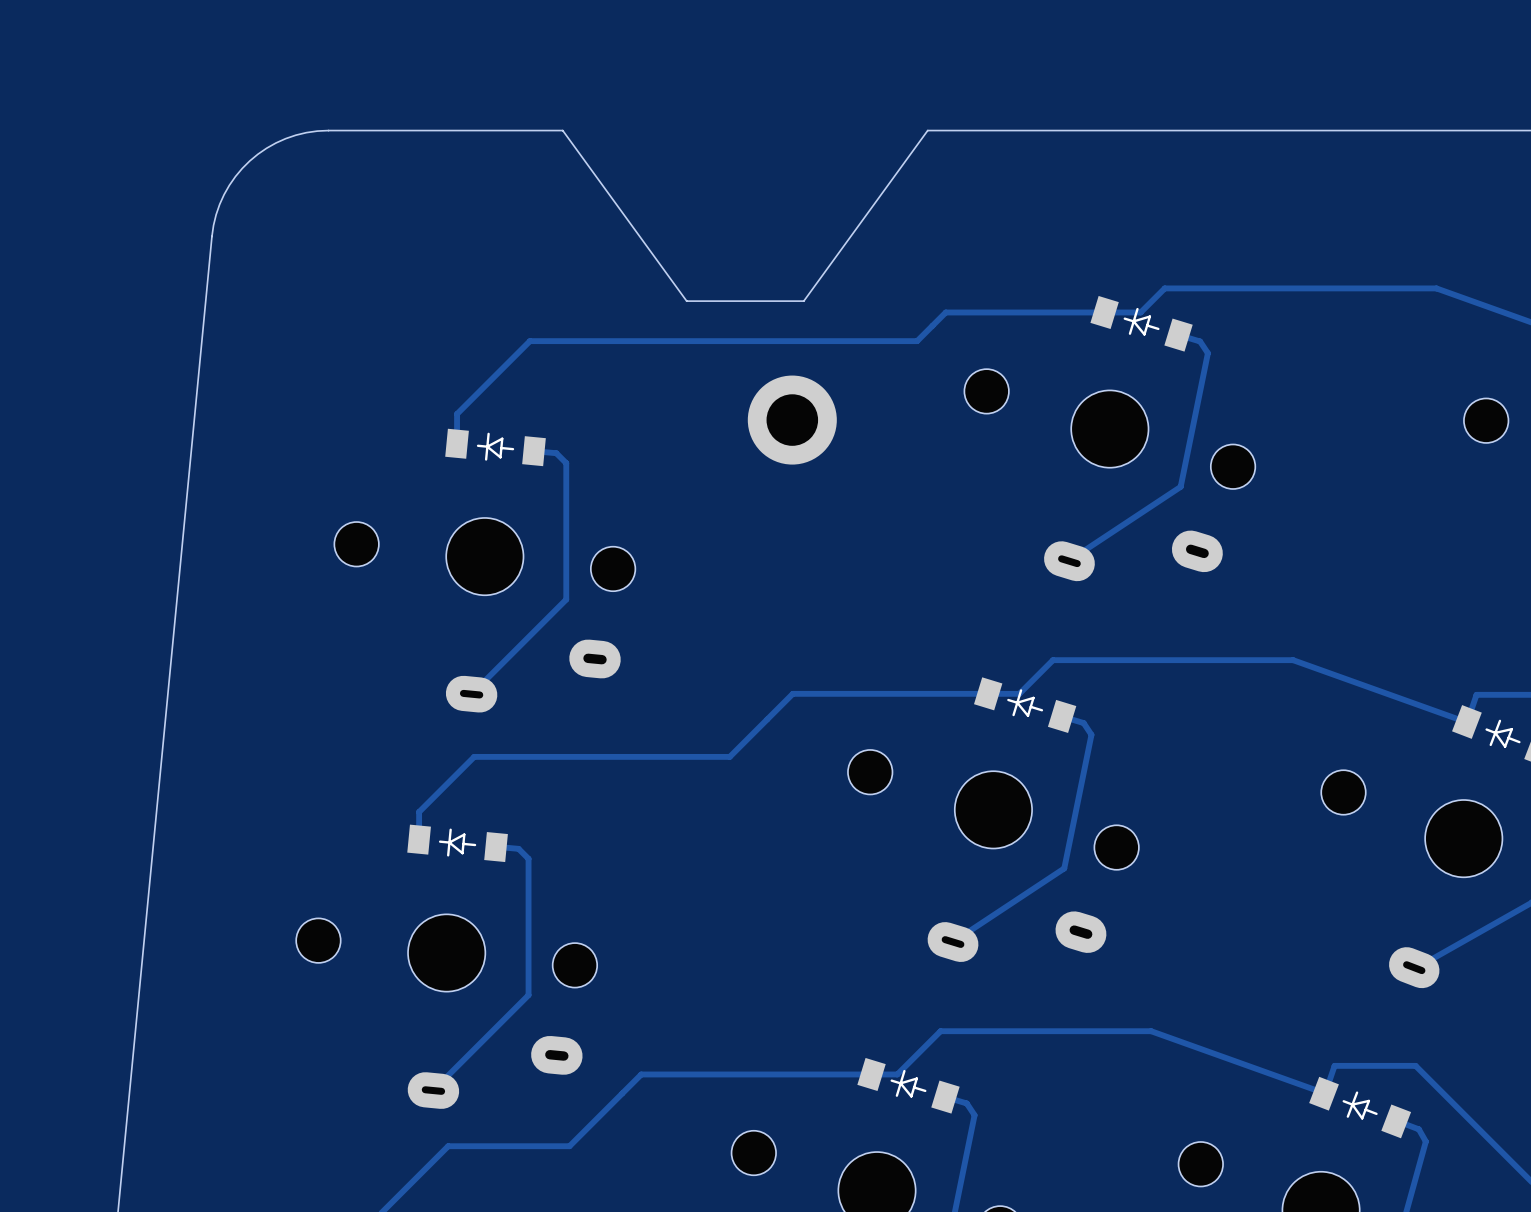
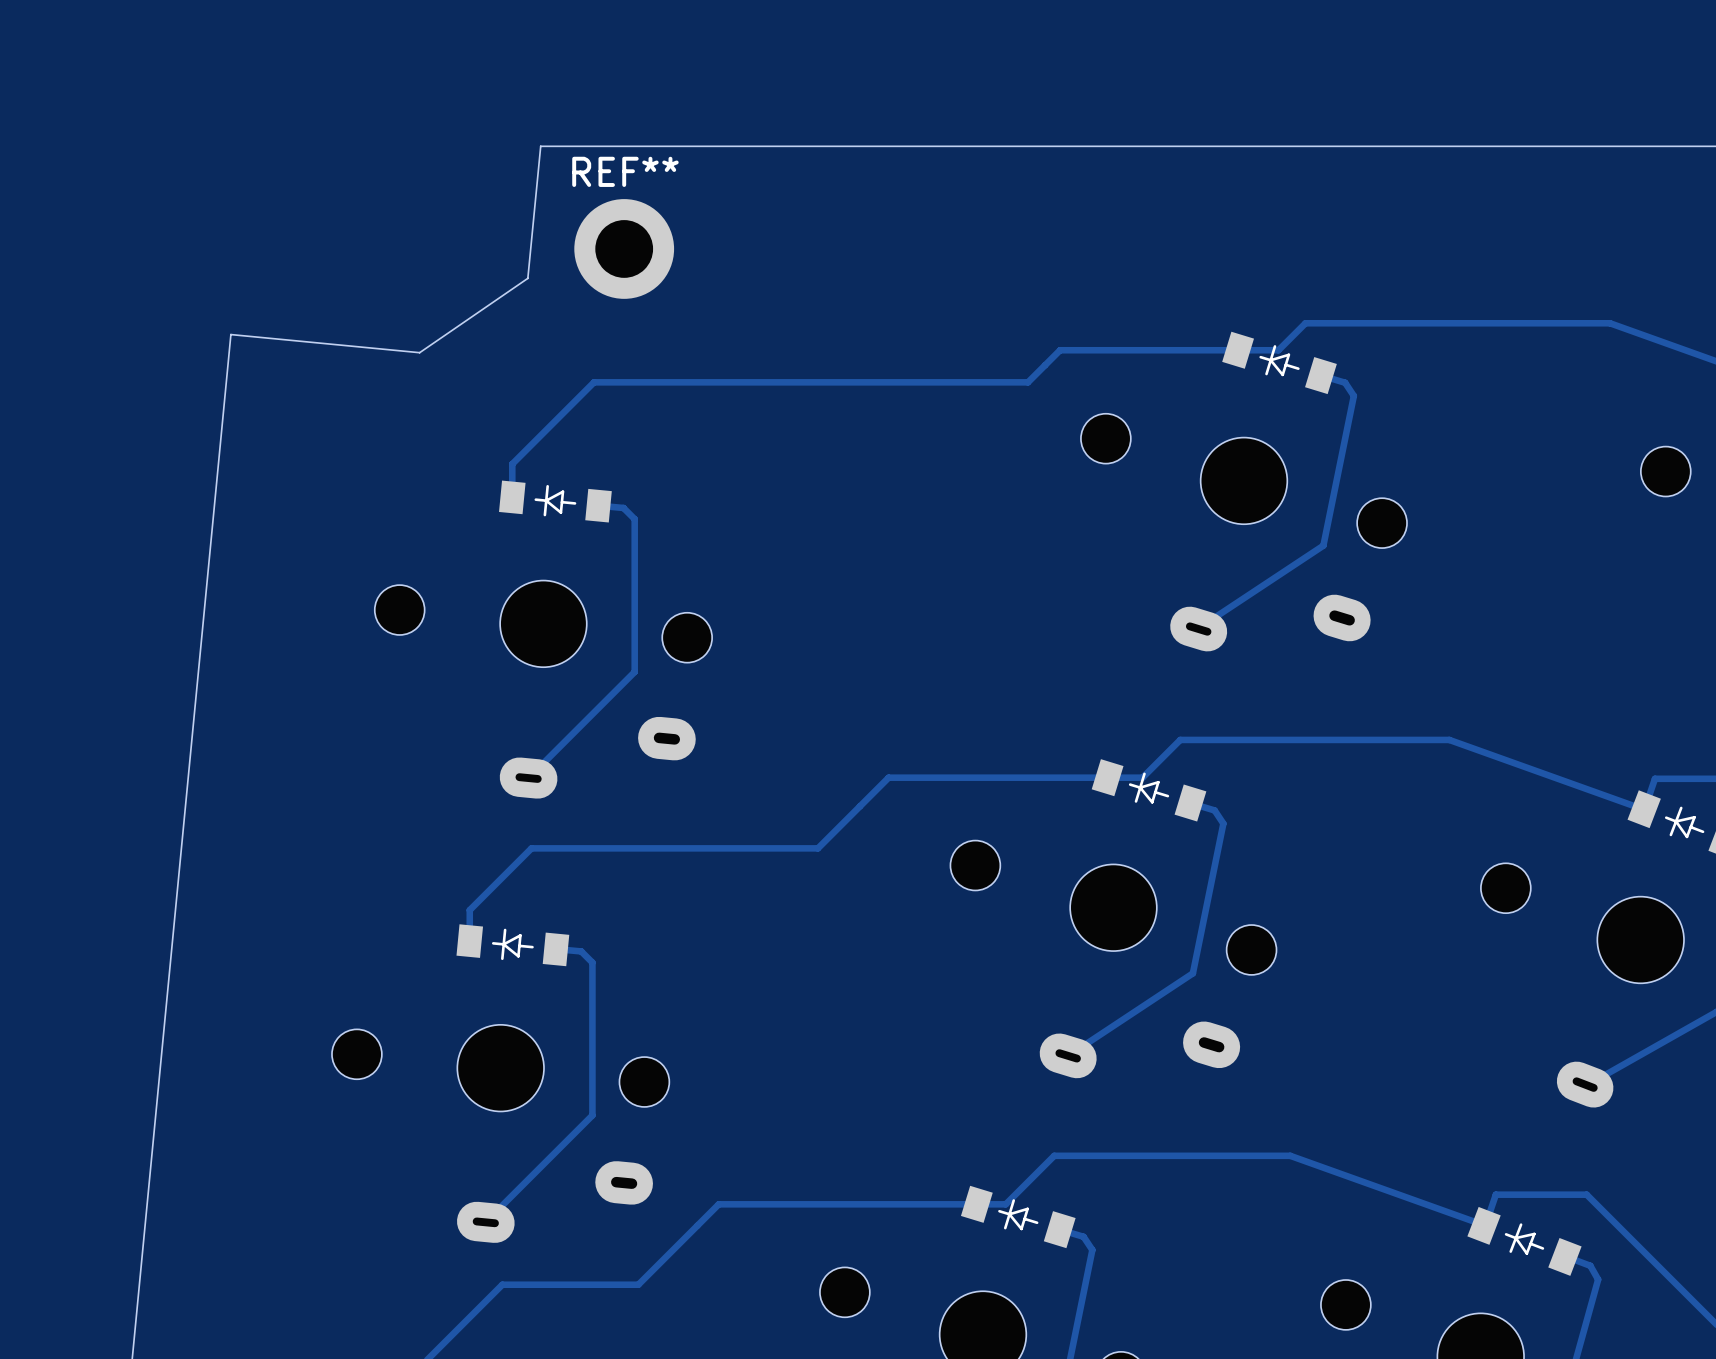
board edge: (482, 130) (317, 131) (295, 135) (266, 148) (249, 160) (235, 176) (219, 204) (213, 225) (206, 298) -> (540, 146) (527, 278) (419, 352) (230, 334)
board edge: (562, 130) (686, 301) (803, 301) (927, 130) -> (630, 146) (1039, 146)
REF**: none -> (624, 248)
part: (792, 420) -> none

